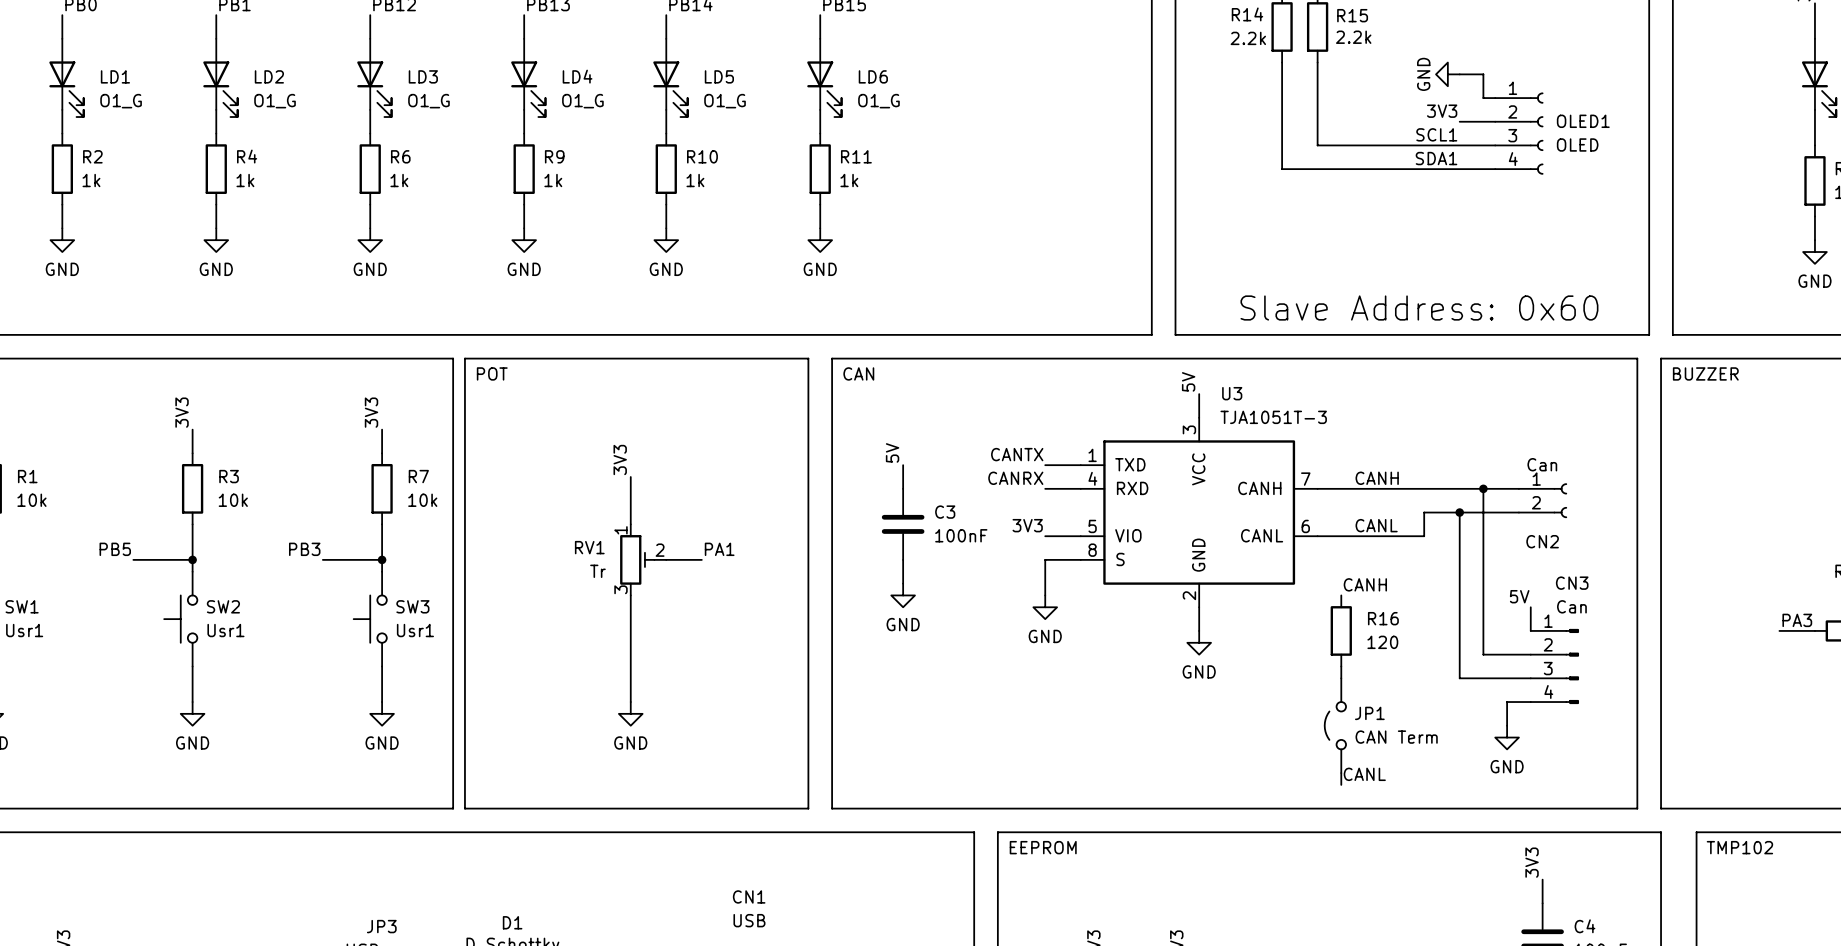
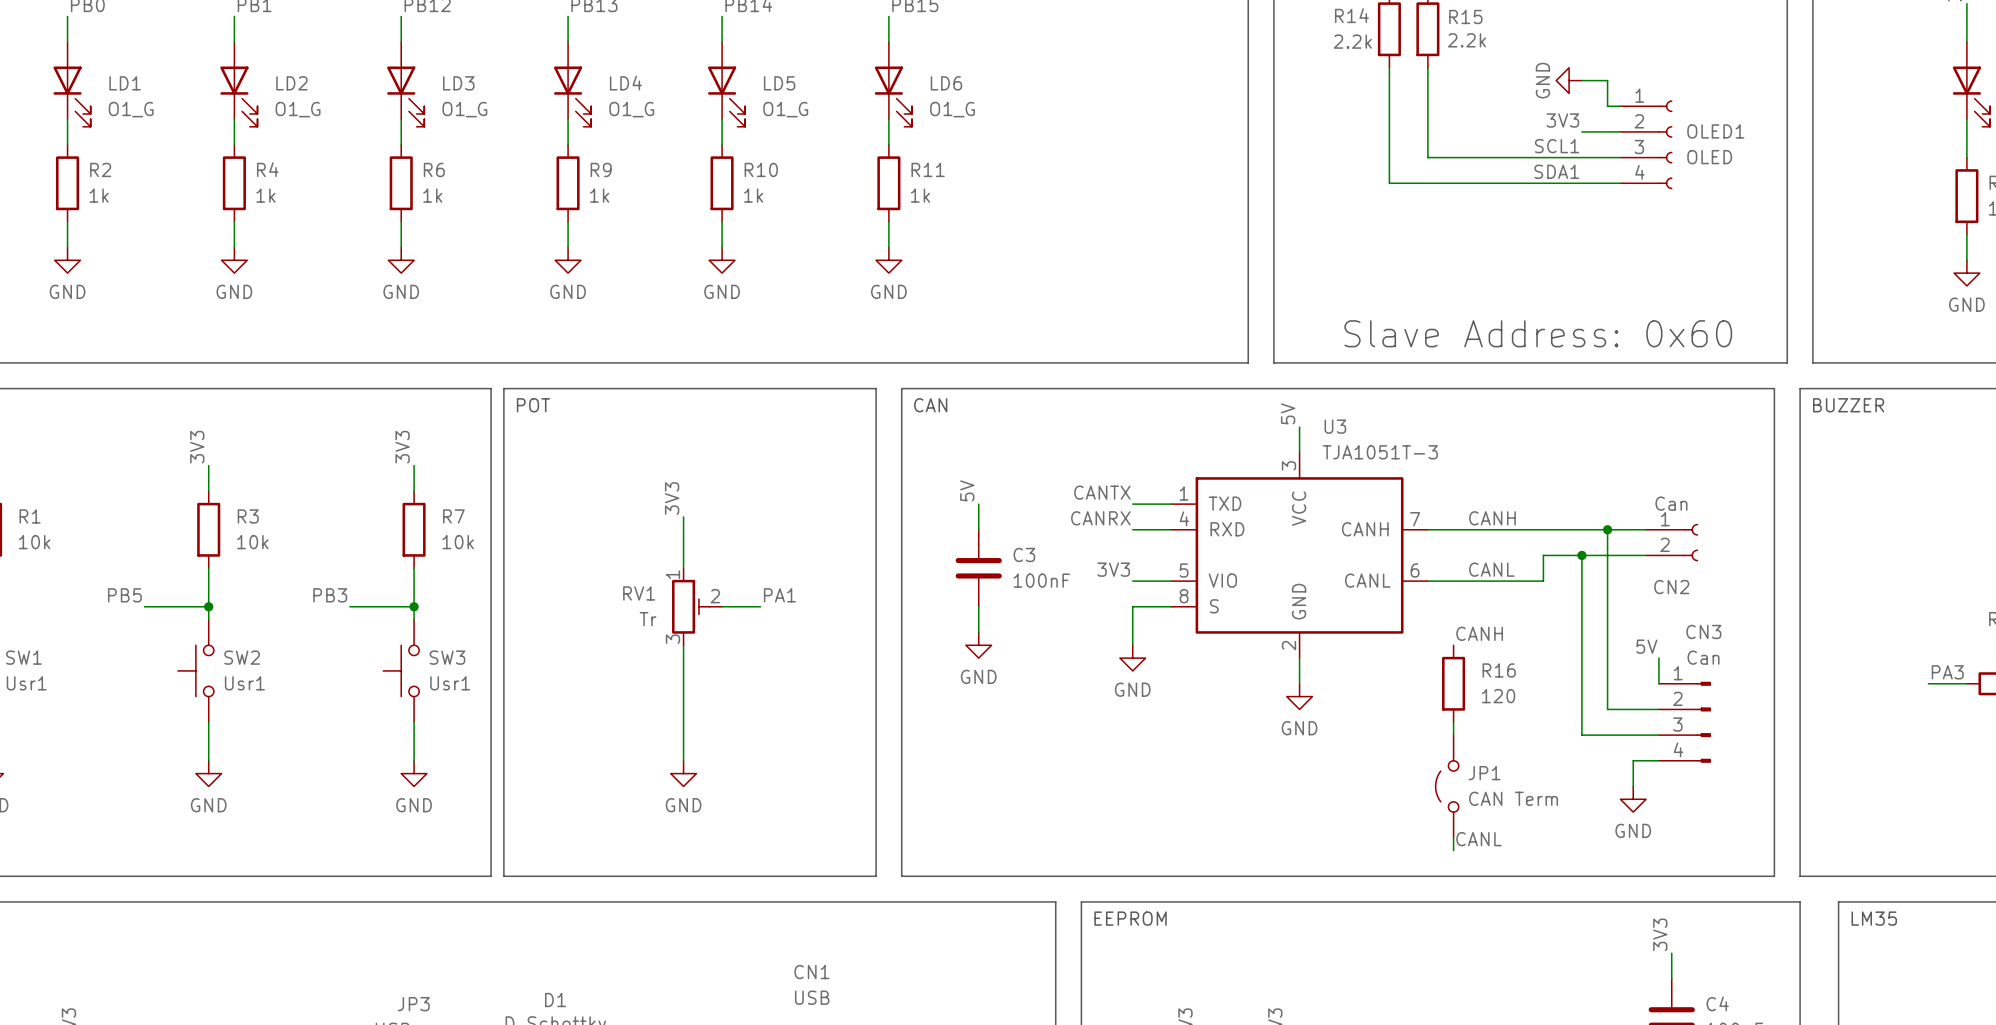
text: TMP102 (1739, 847) -> LM35 (1874, 918)

